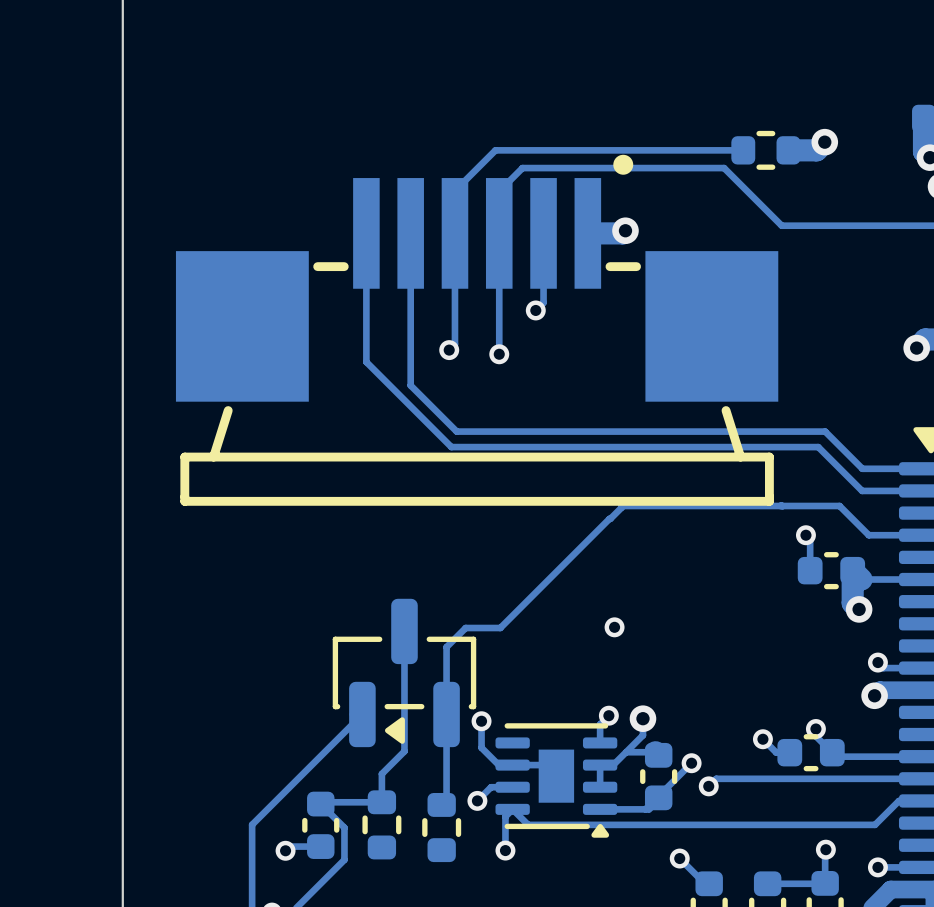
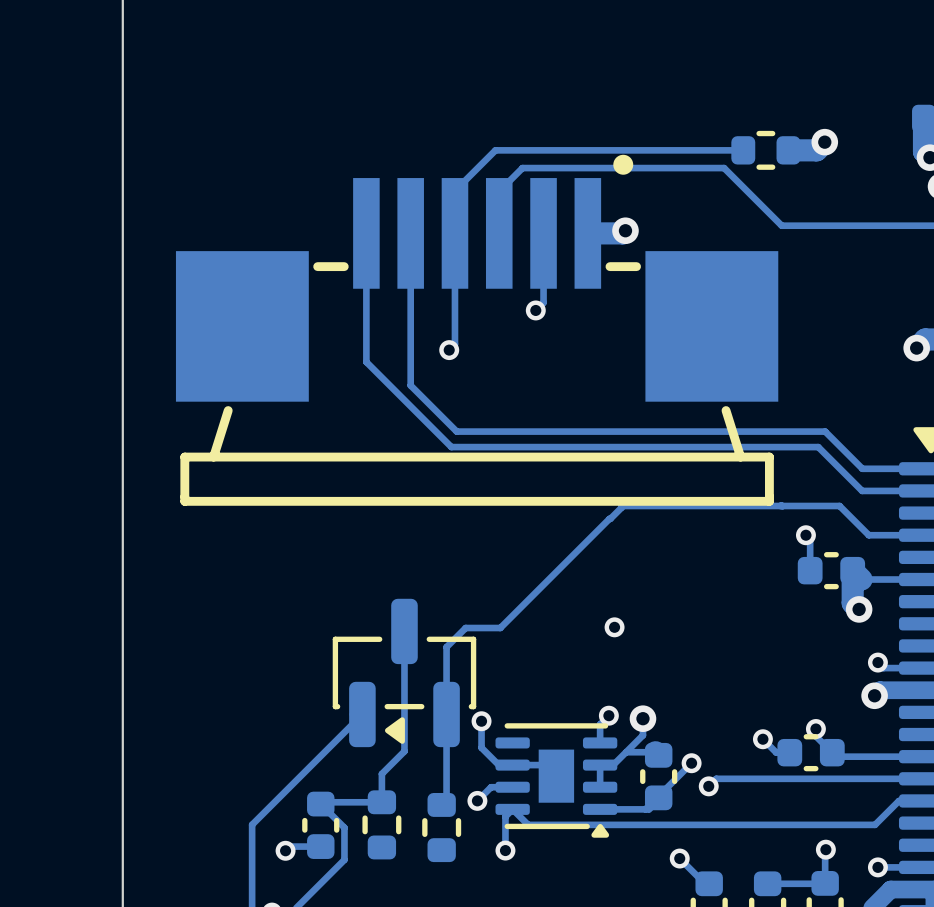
track: (499, 233) (499, 354) -> none
via: (499, 354) -> none

